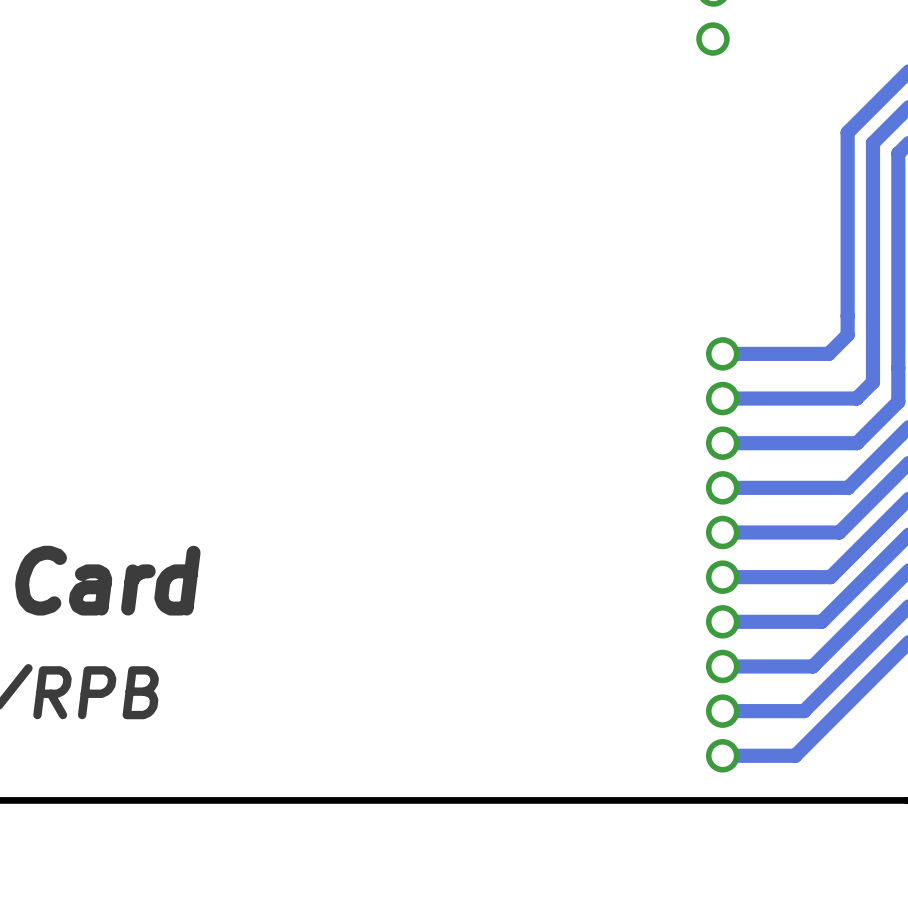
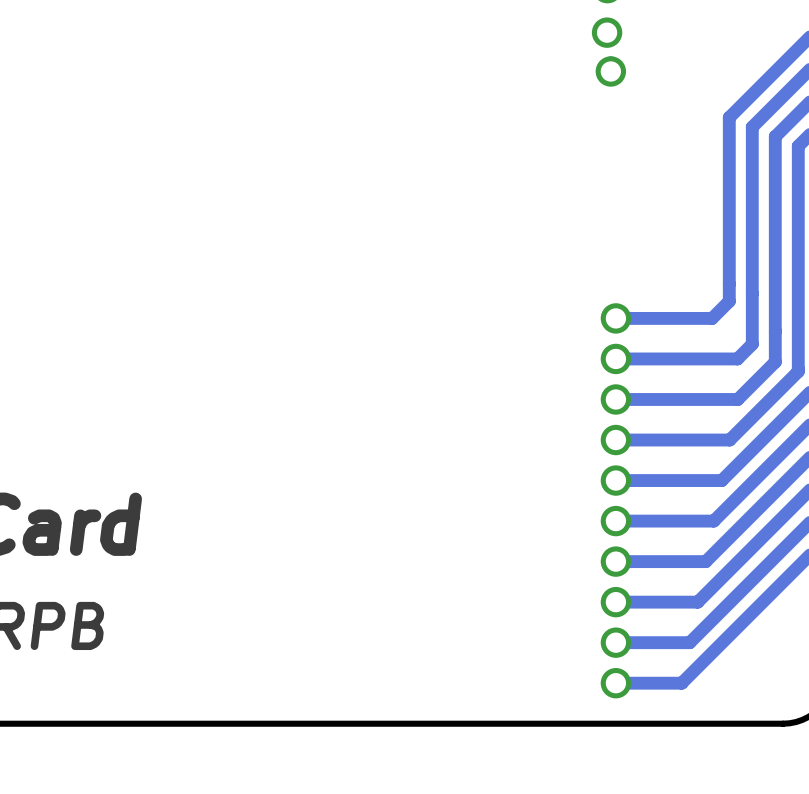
via: none -> (610, 71)

